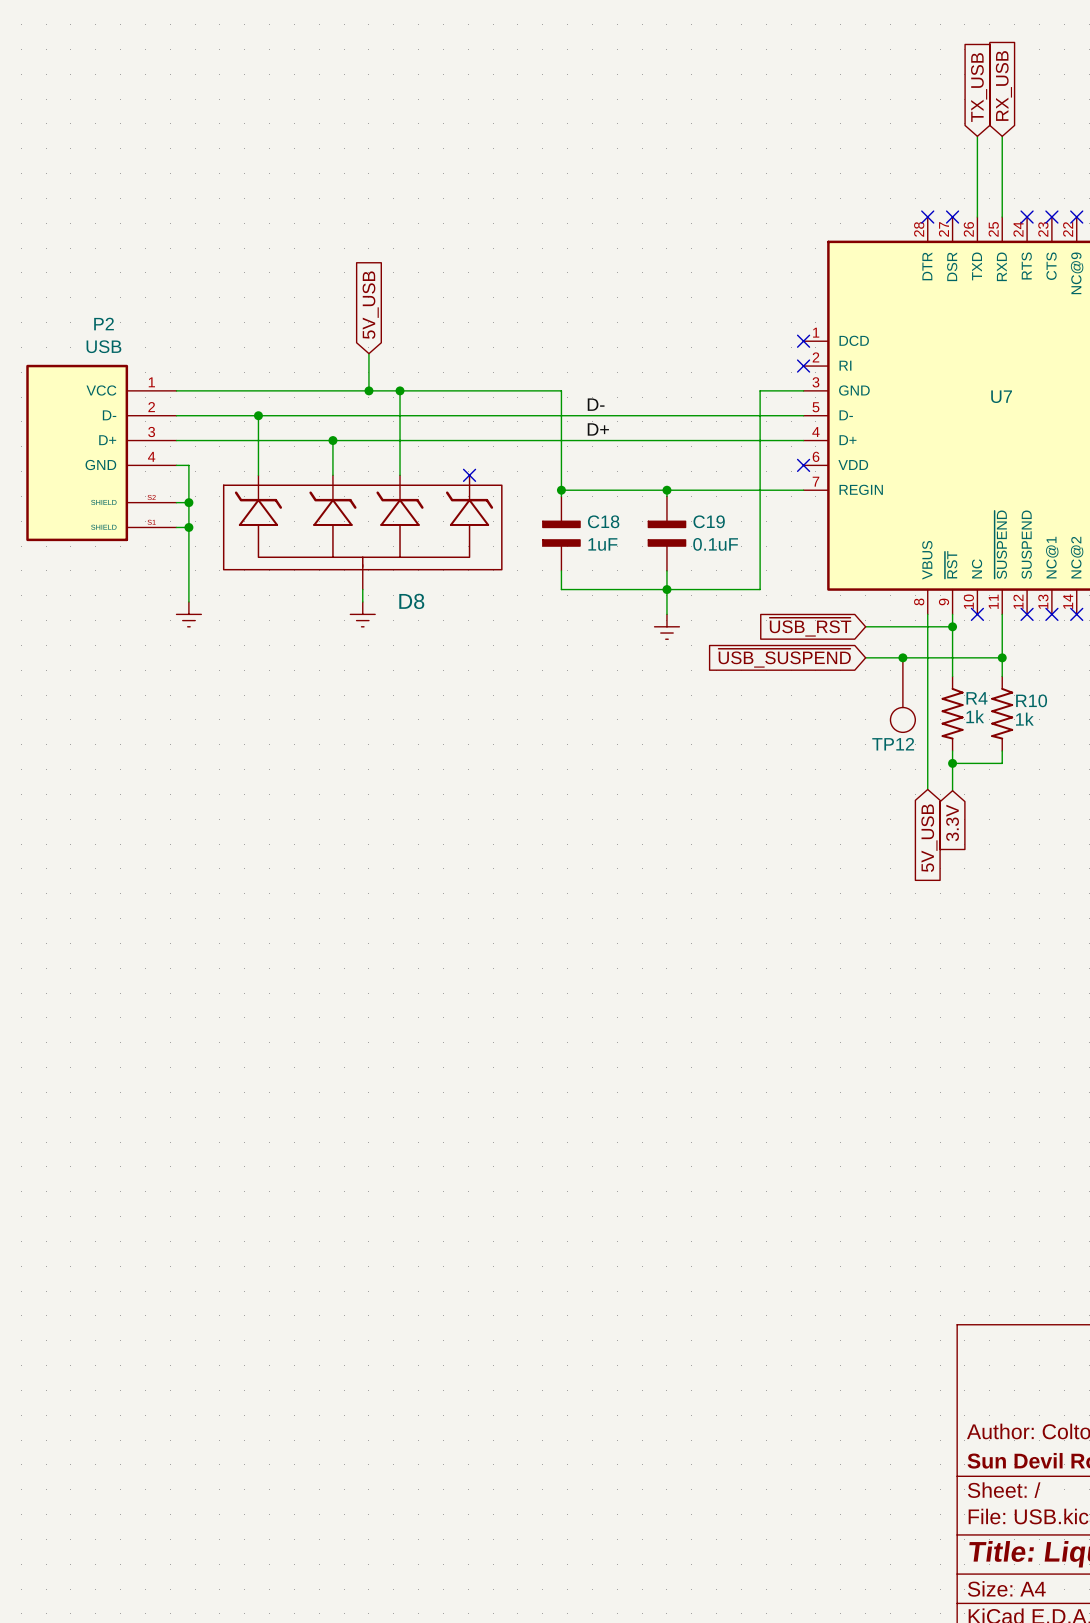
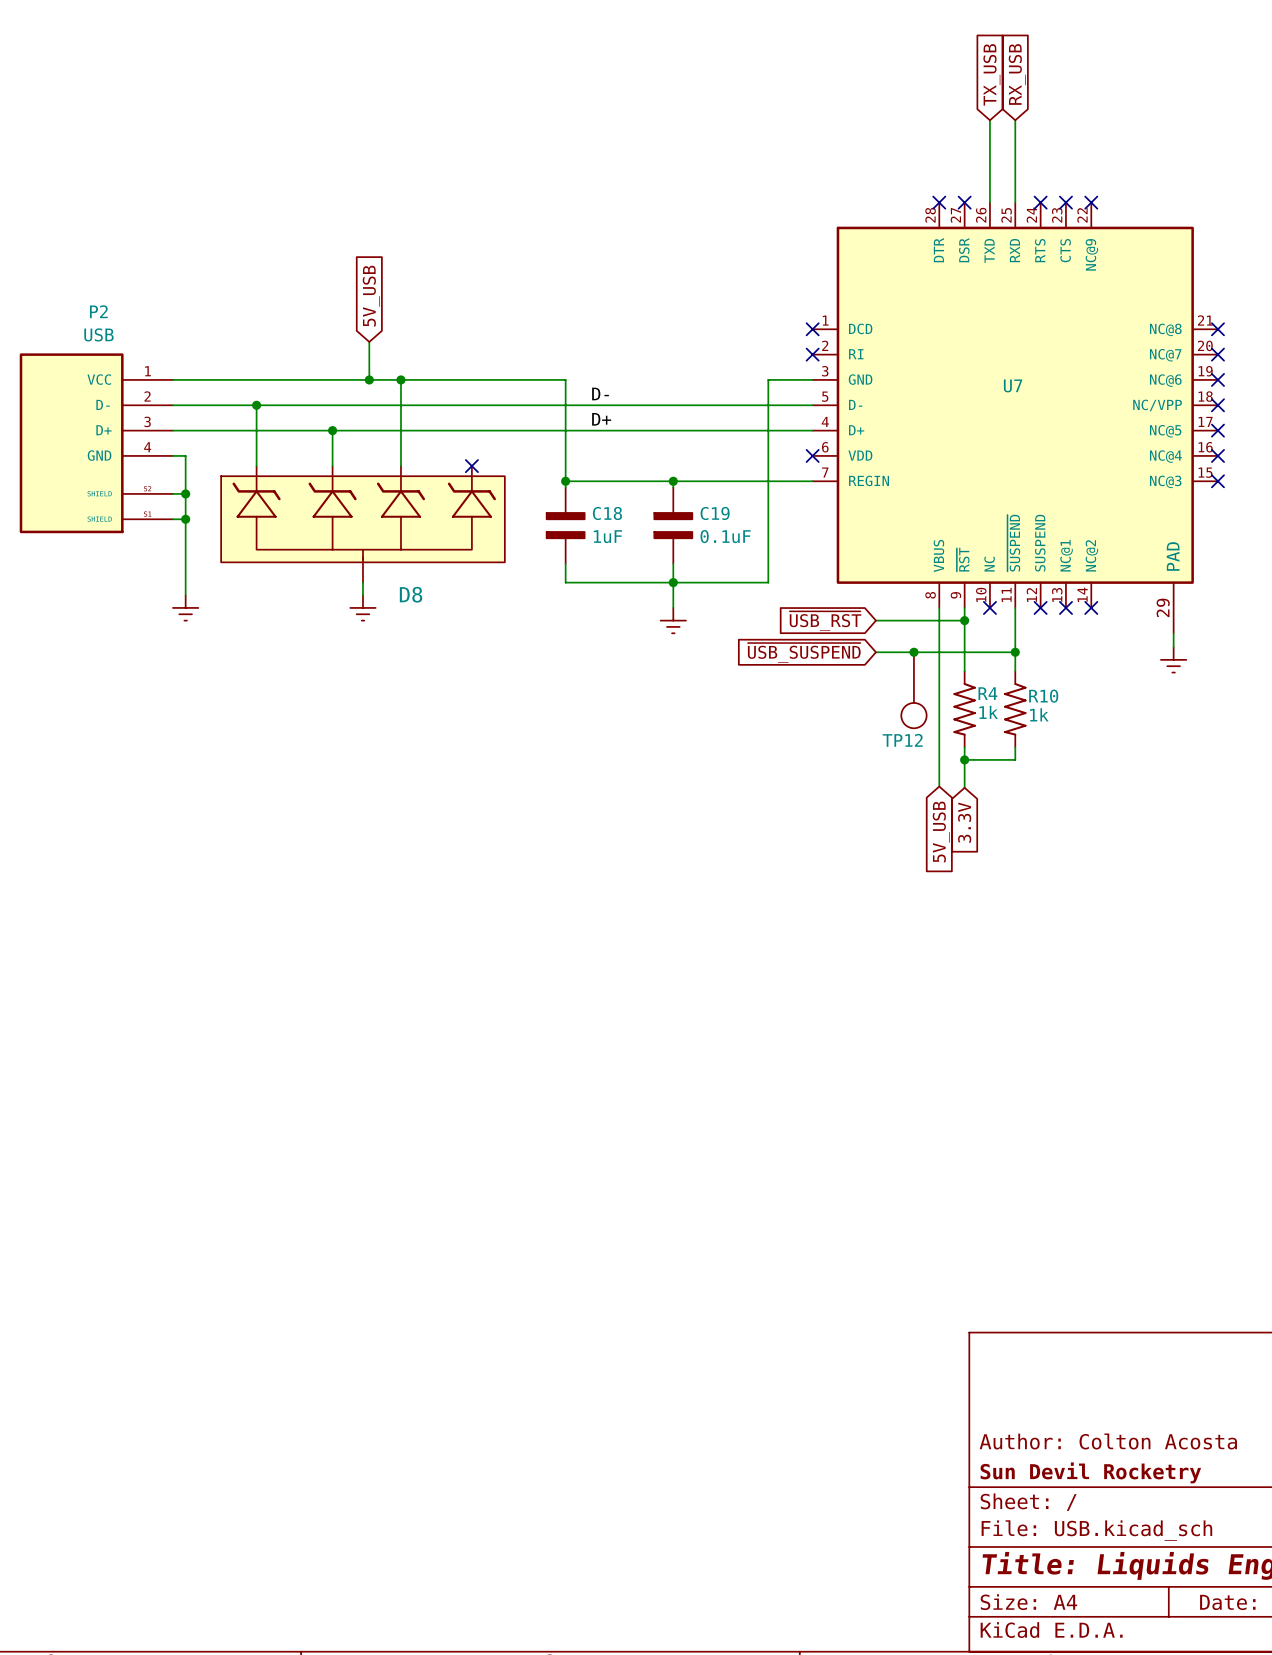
D8 symbol: [222, 475, 503, 590] -> [220, 466, 506, 583]

